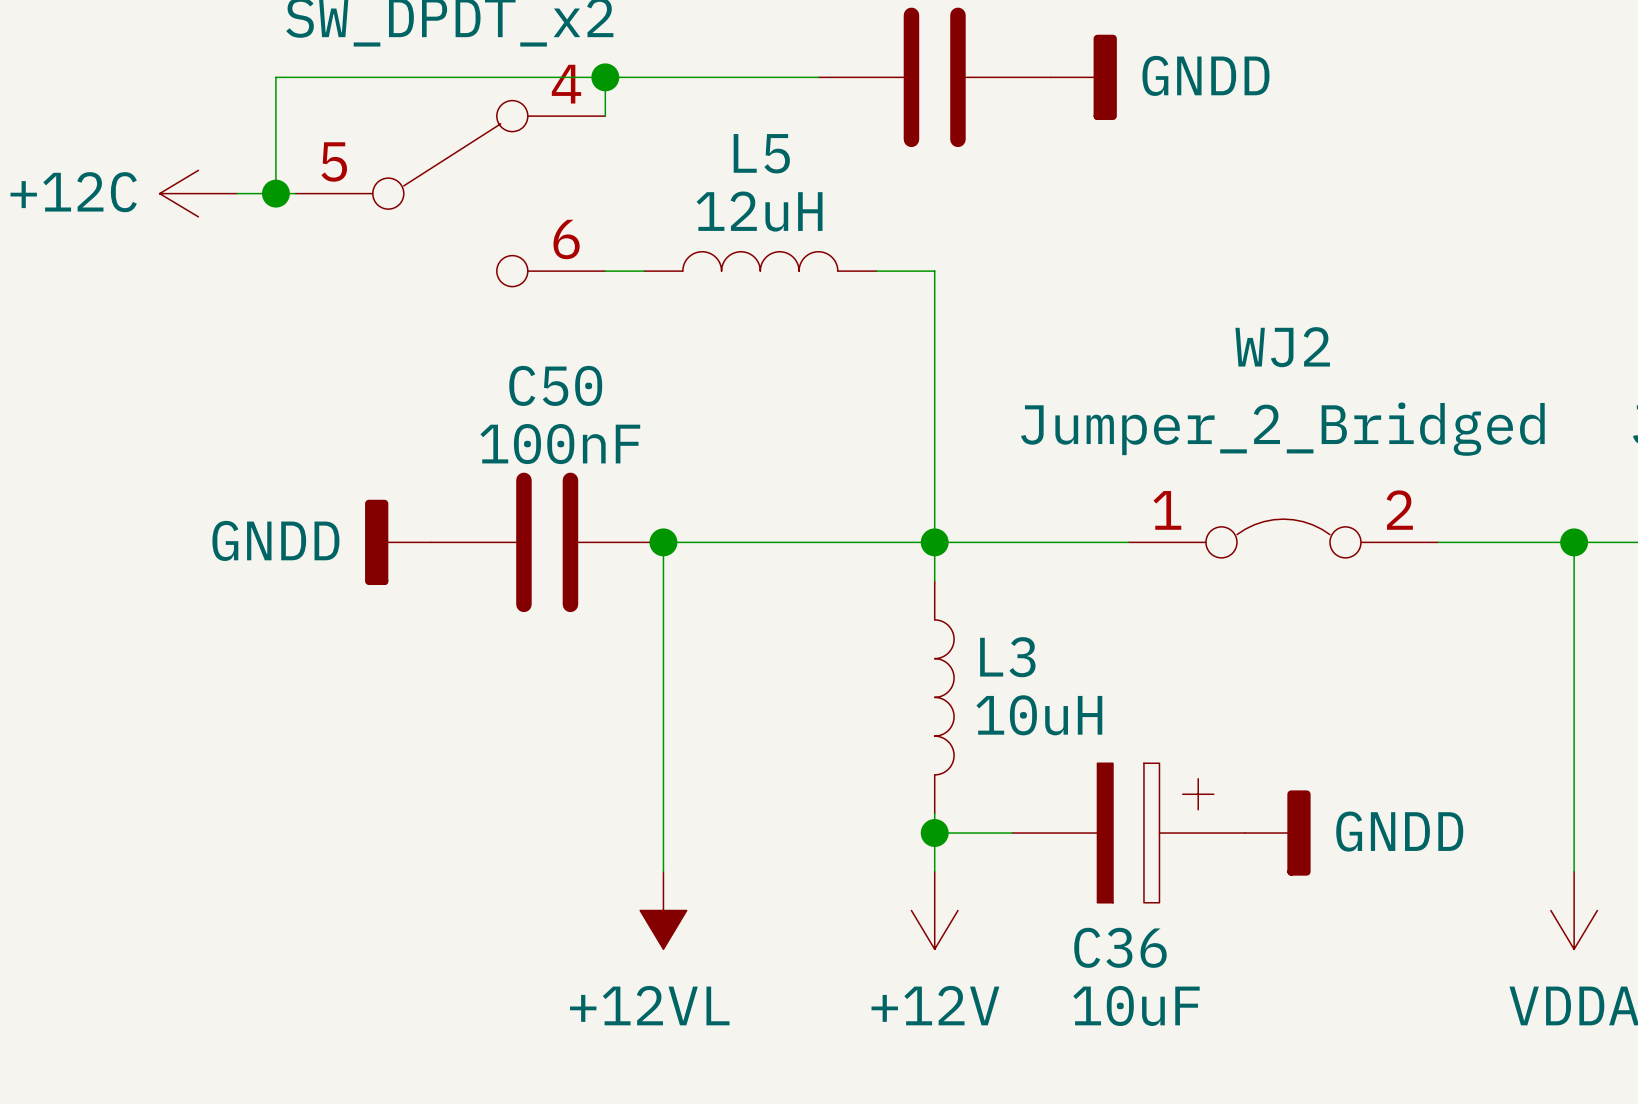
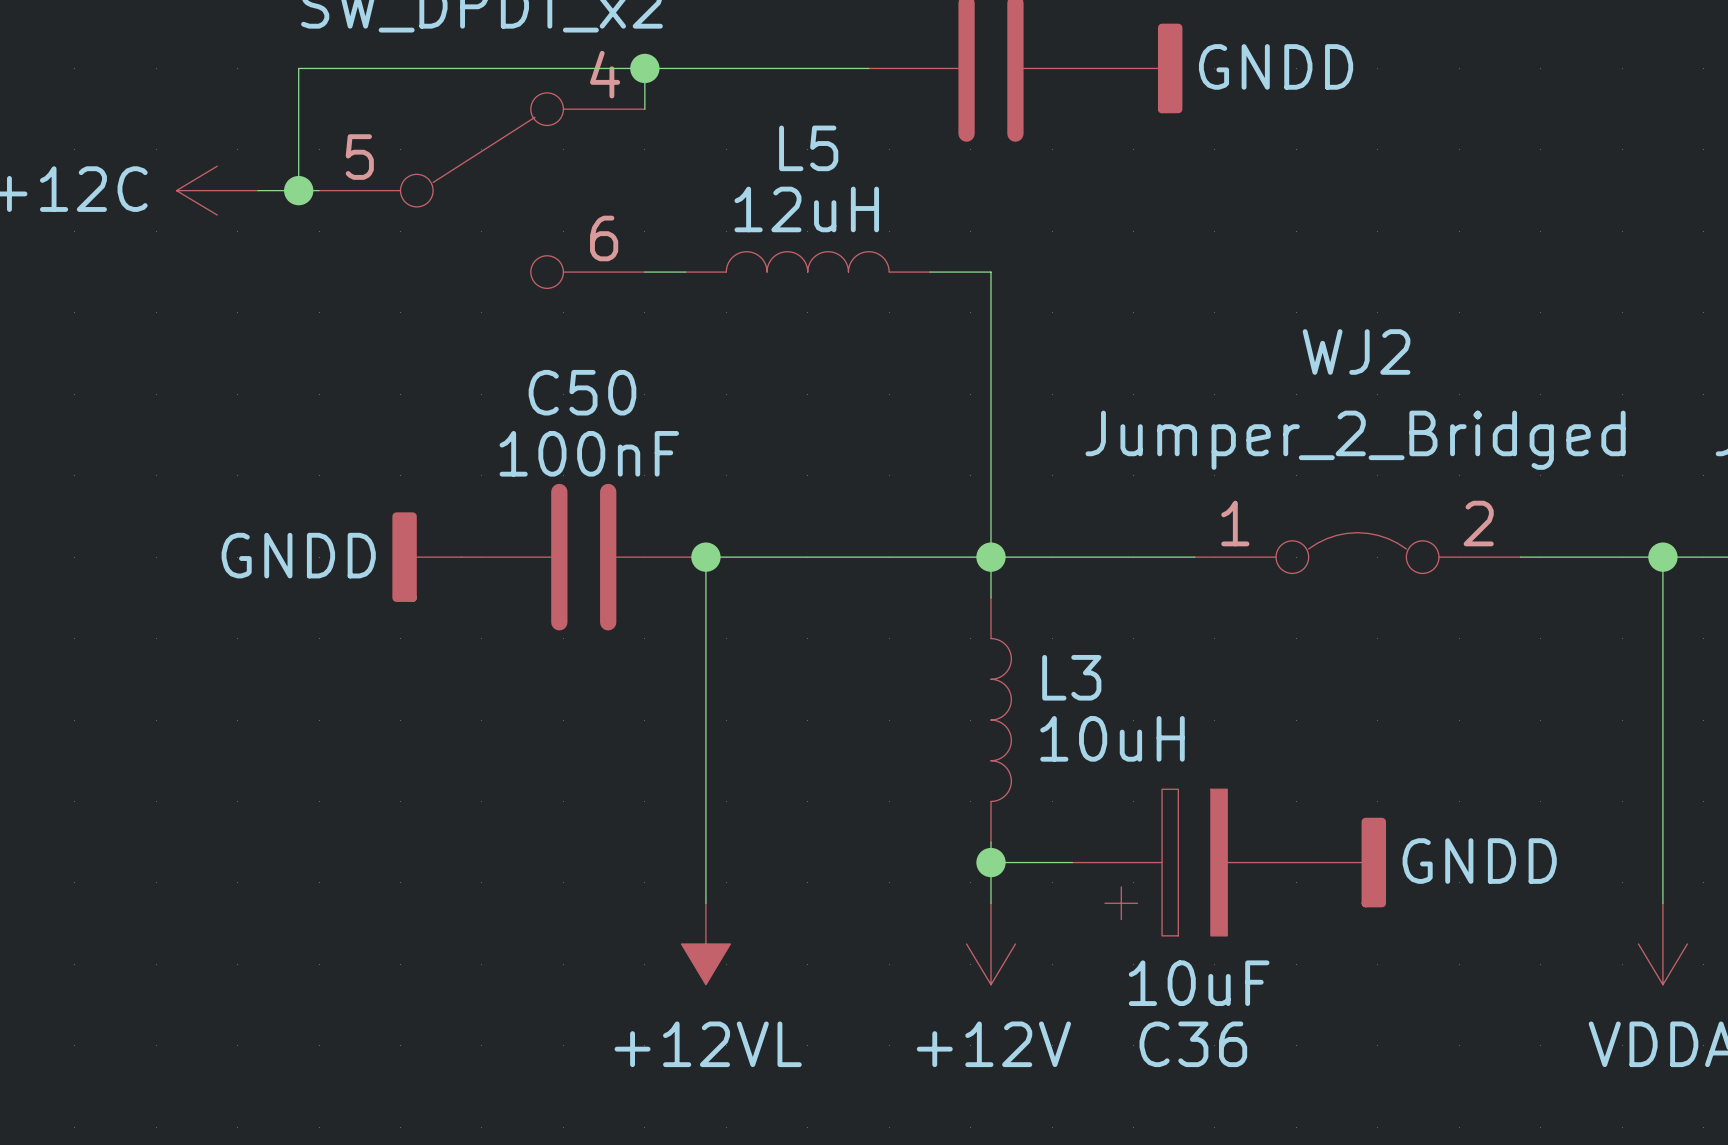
C36 rotation: 0° (1155, 833) -> 180° (1166, 862)
C36 name position: C36 (1120, 947) -> C36 (1193, 1044)
C36 value position: 10uF (1136, 1005) -> 10uF (1199, 983)

